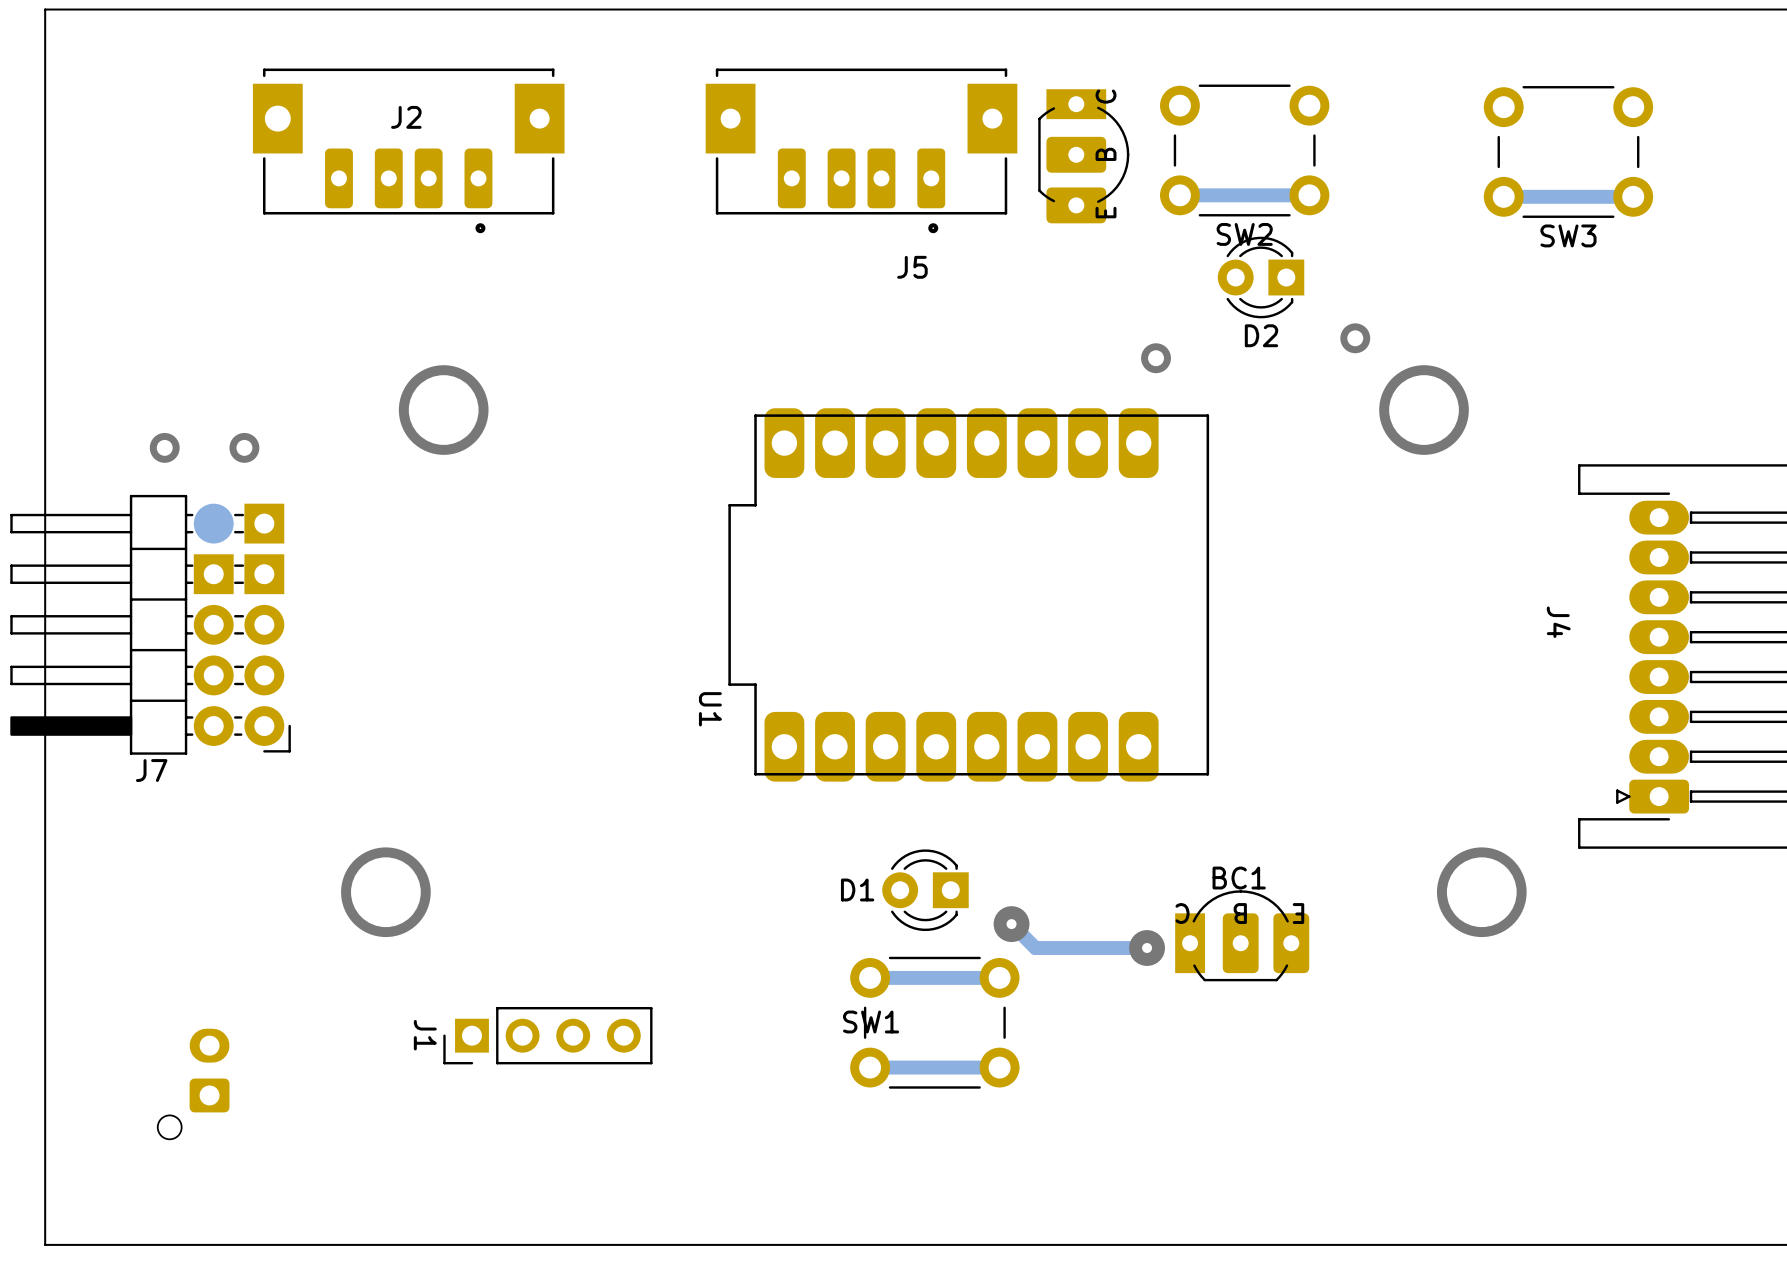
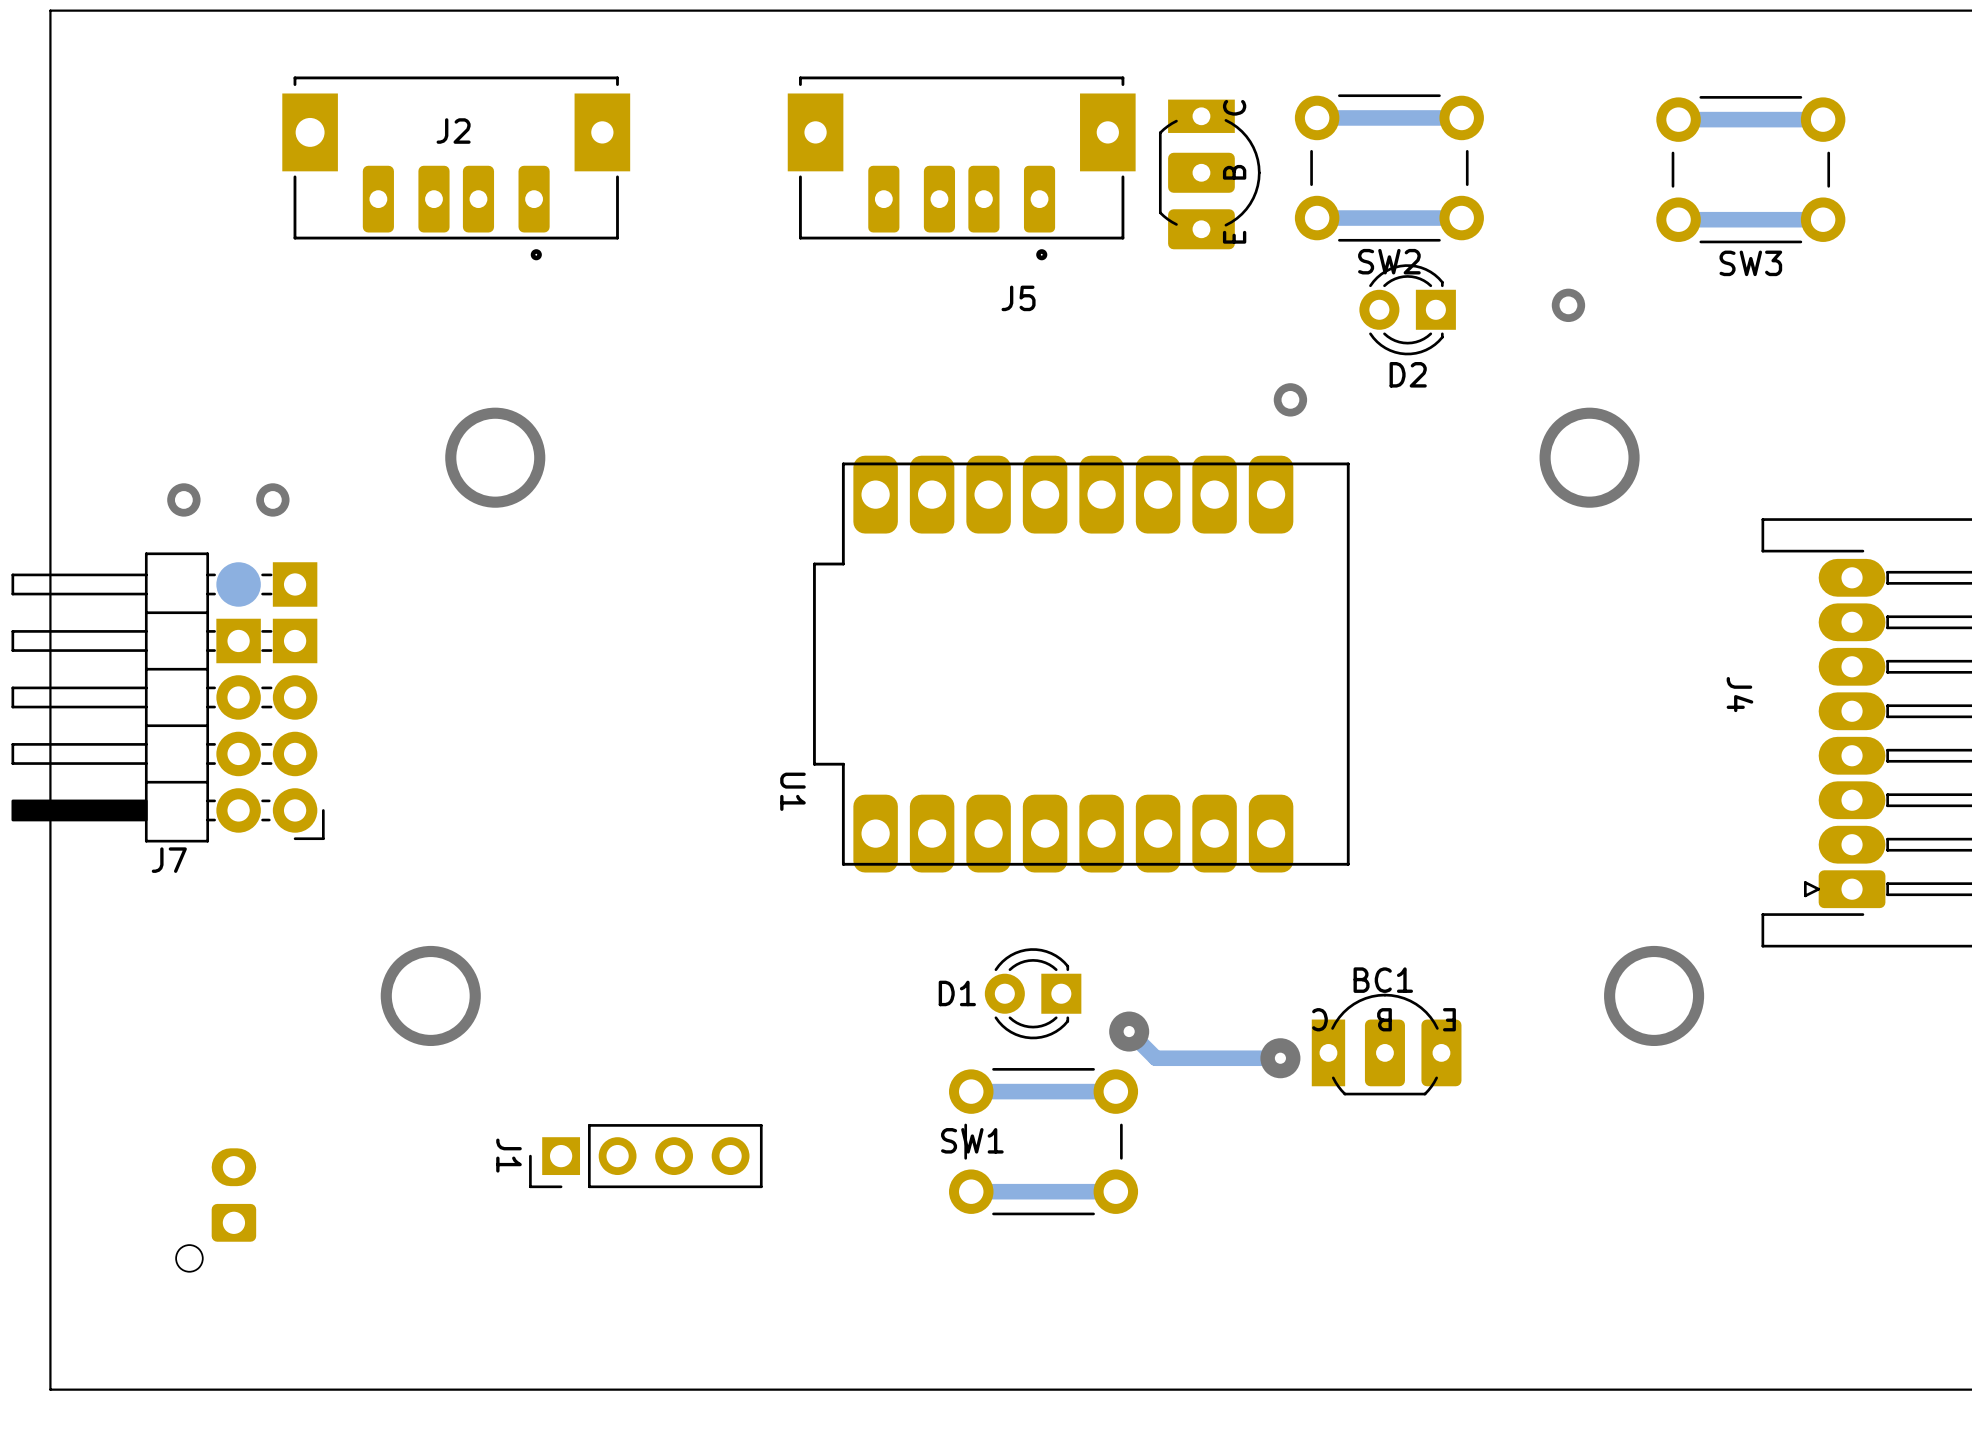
track: none -> (1461, 117) (1317, 117)
track: none -> (1823, 119) (1678, 119)
via position: (1355, 338) -> (1568, 305)
J1 position: (547, 1035) -> (645, 1156)

